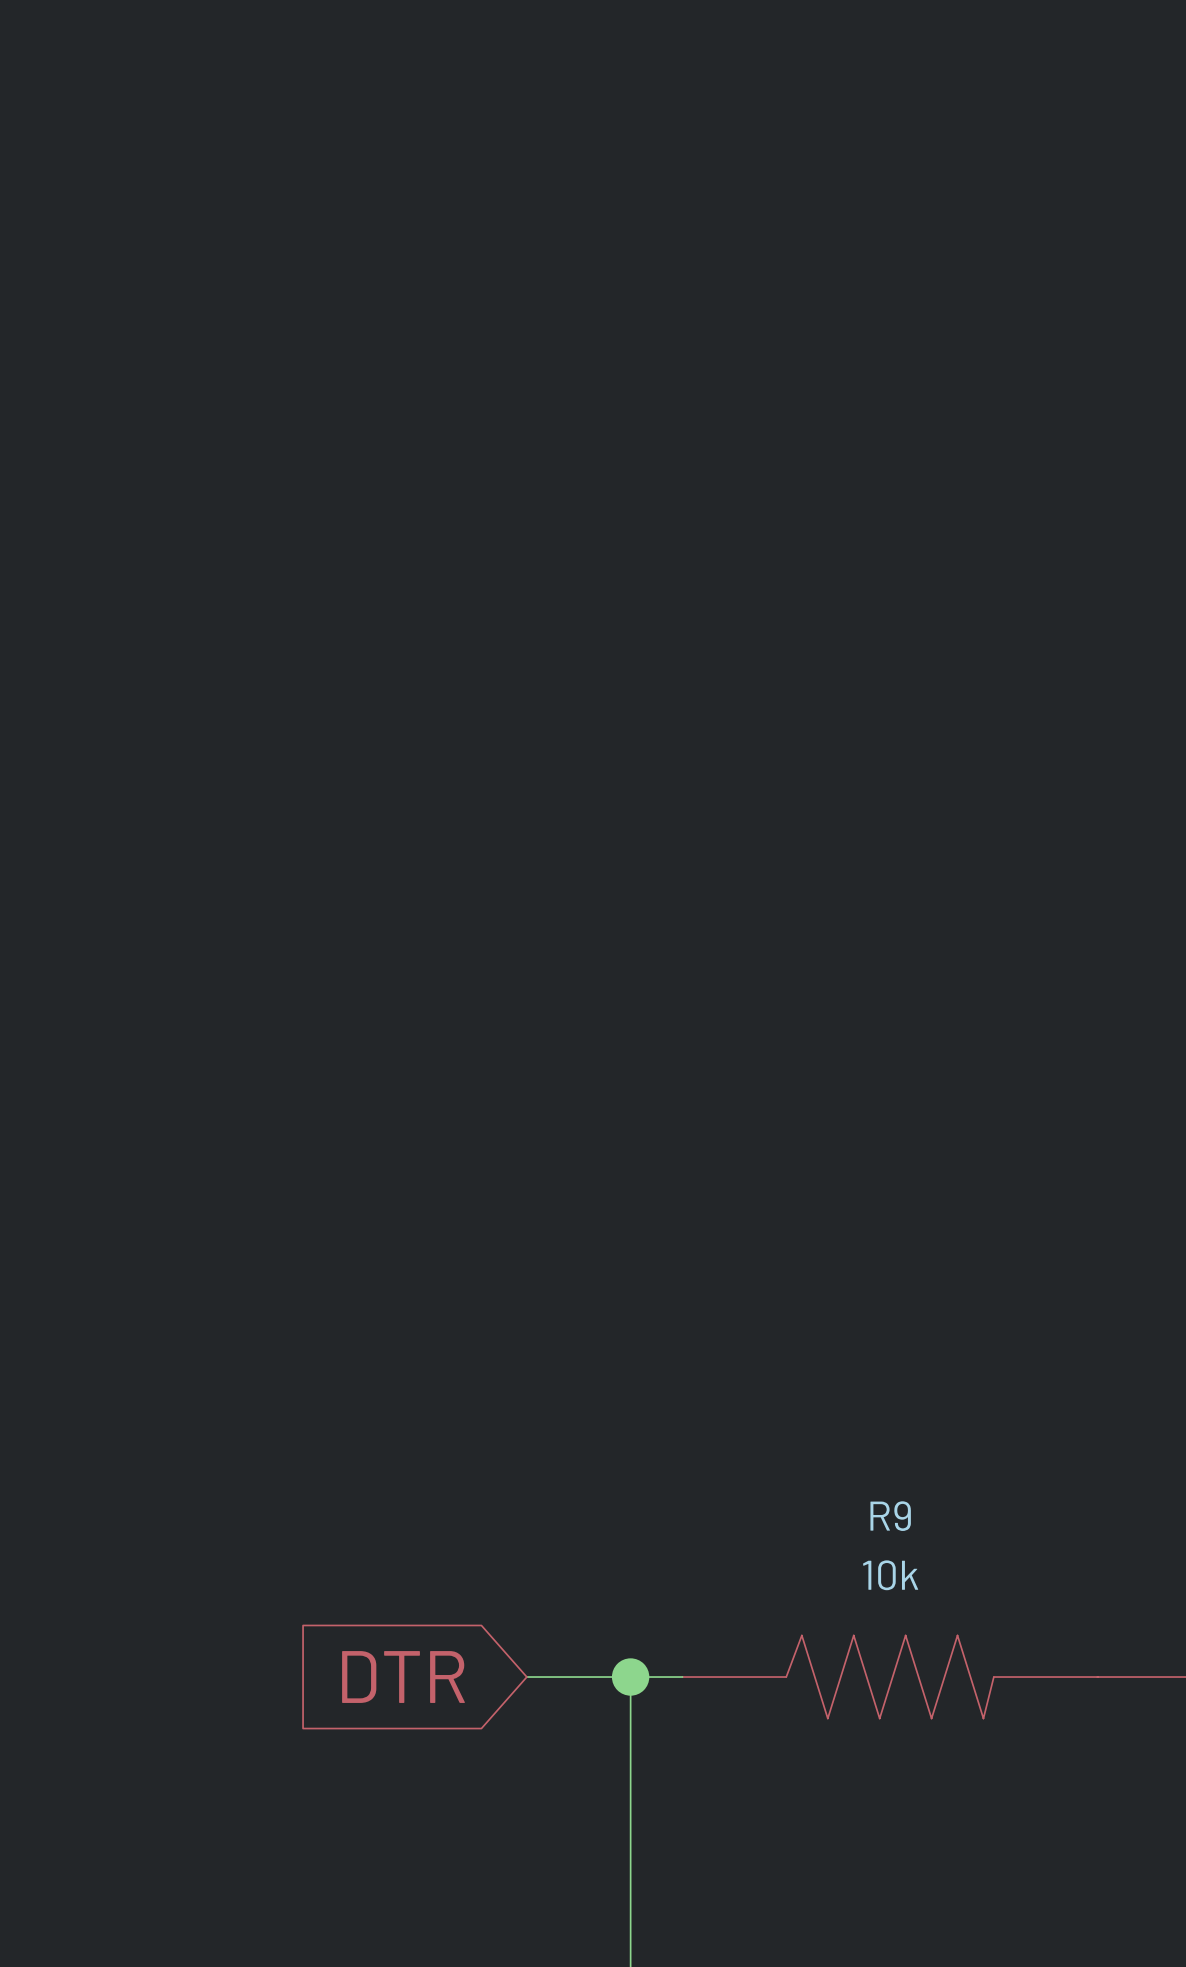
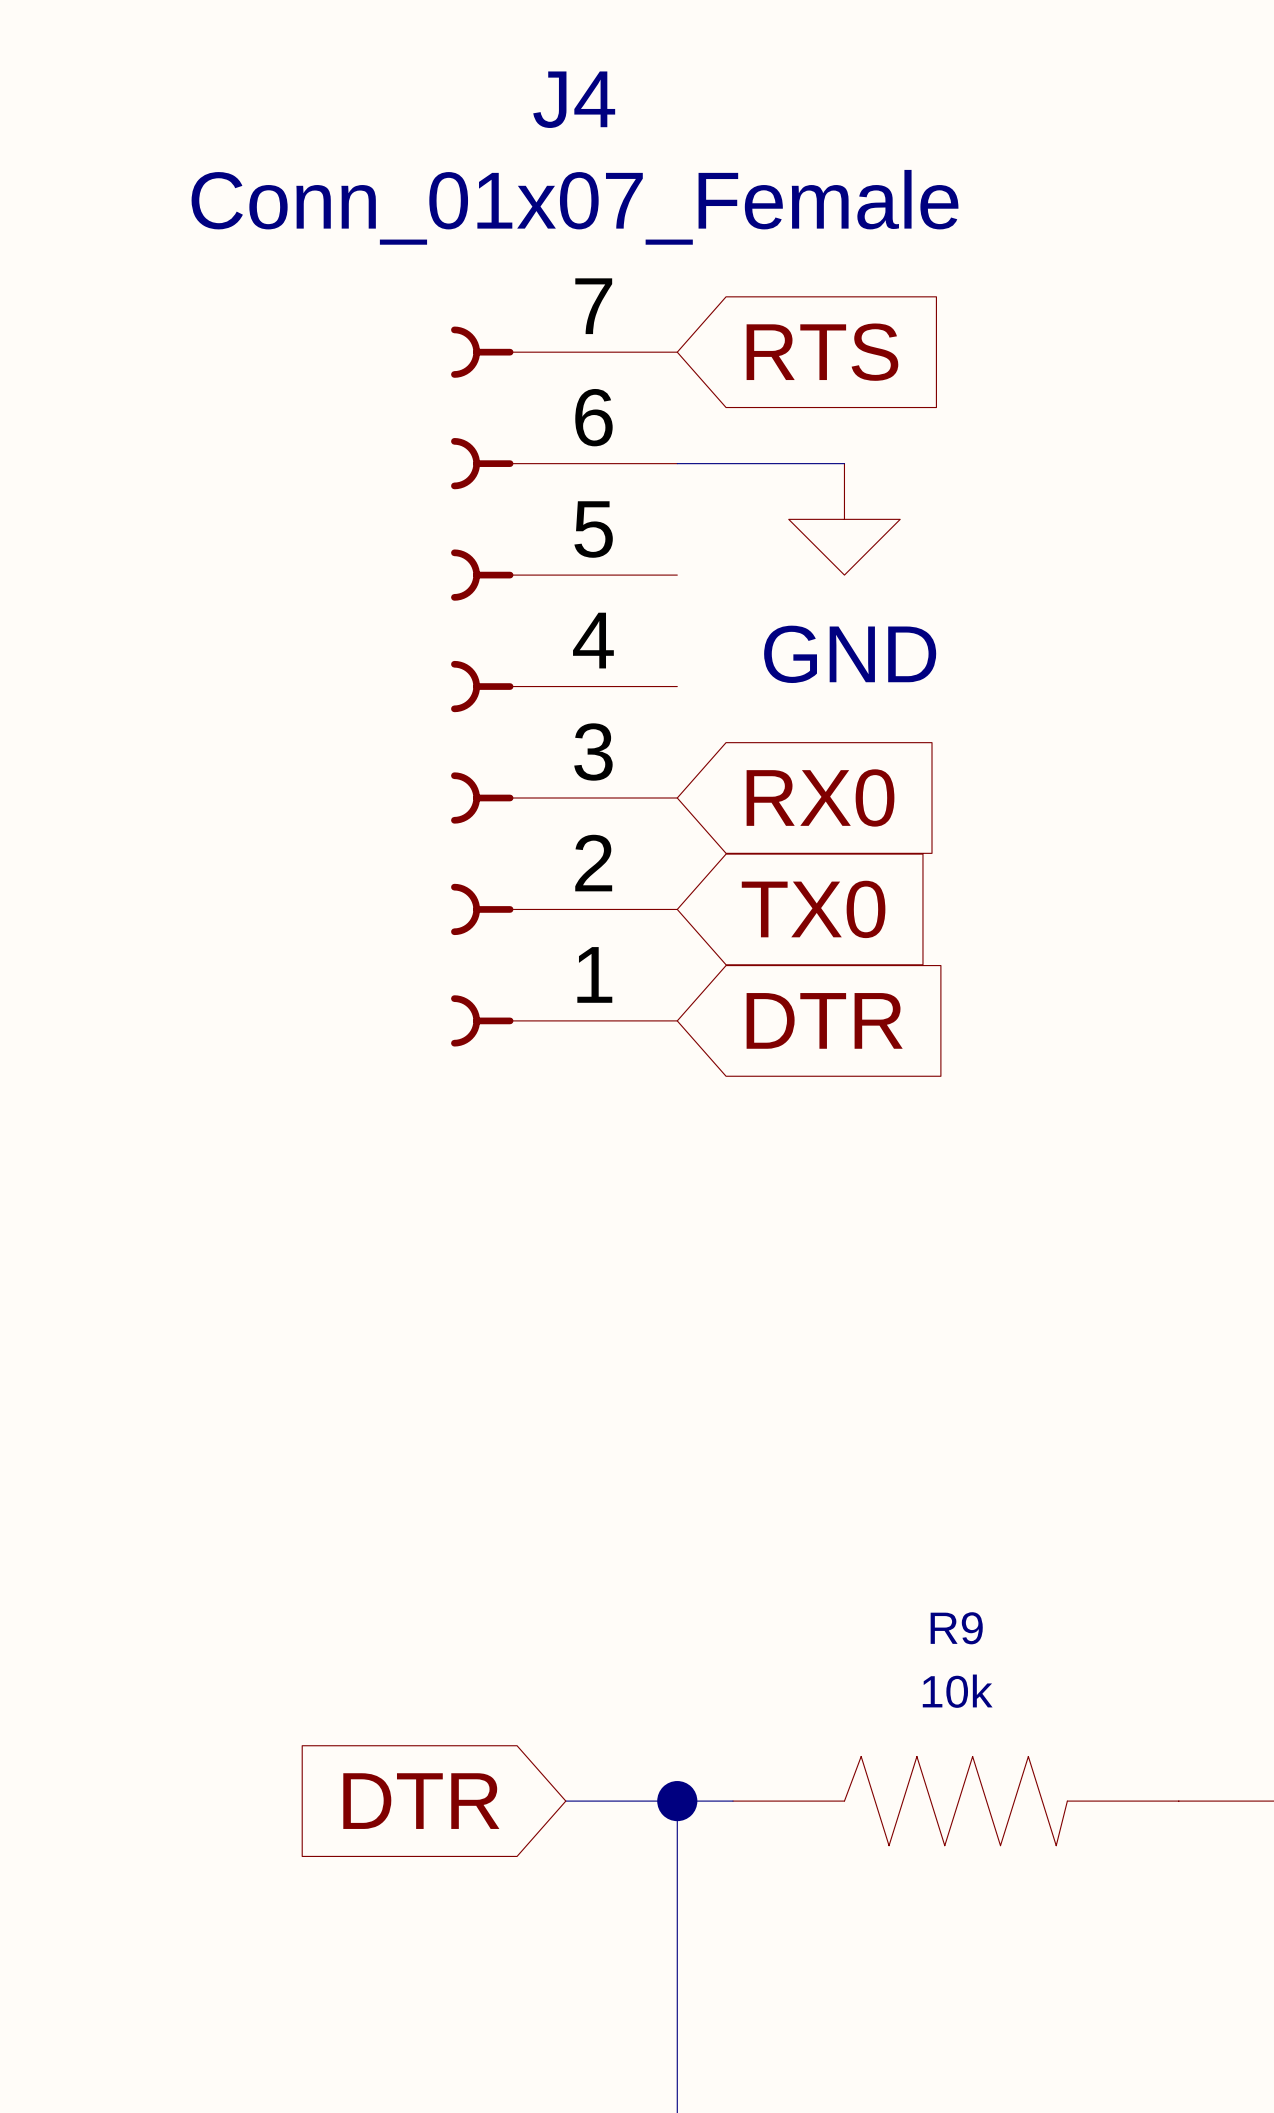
global label: none -> RTS (822, 352)
wire: none -> (677, 463) (844, 463)
power symbol: none -> GND (844, 519)
J4: none -> Conn_01x07_Female (564, 686)
global label: none -> RX0 (820, 797)
global label: none -> TX0 (813, 909)
global label: none -> DTR (824, 1020)

